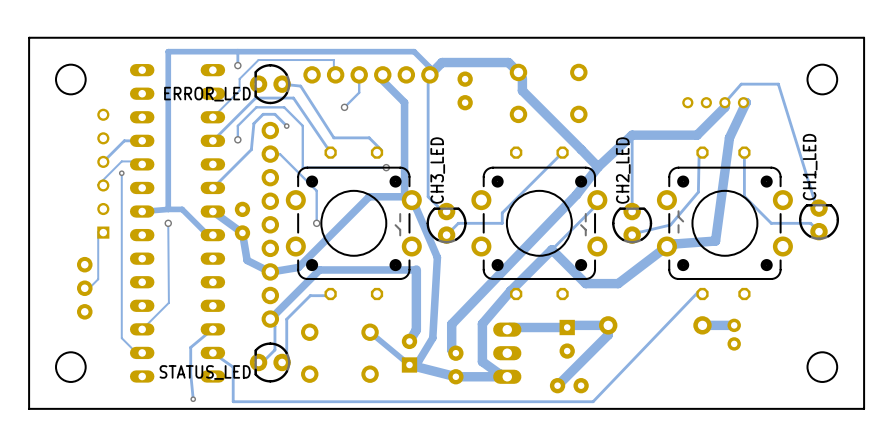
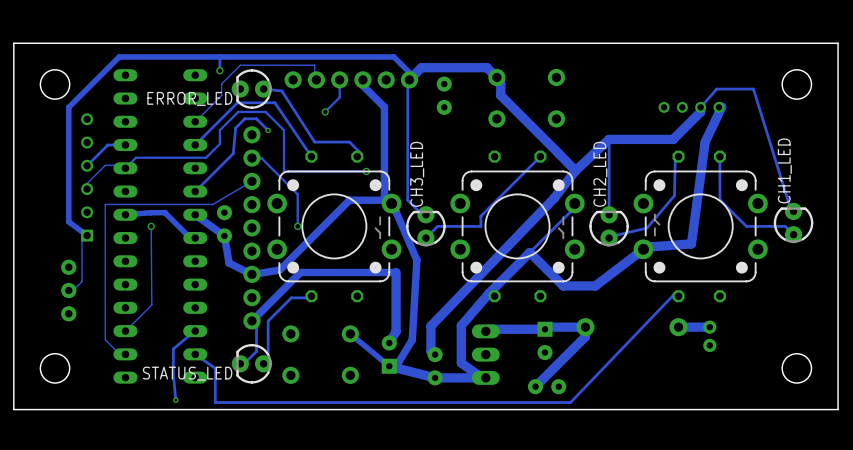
track: (168, 51) (168, 209) -> (151, 56) (119, 56) (68, 107) (68, 221) (87, 235)
track: none -> (219, 143) (206, 157) (135, 157) (125, 168)
via: (237, 139) -> none
track: (121, 173) (121, 201) -> (251, 181) (212, 204) (105, 204)
via: (121, 173) -> none

